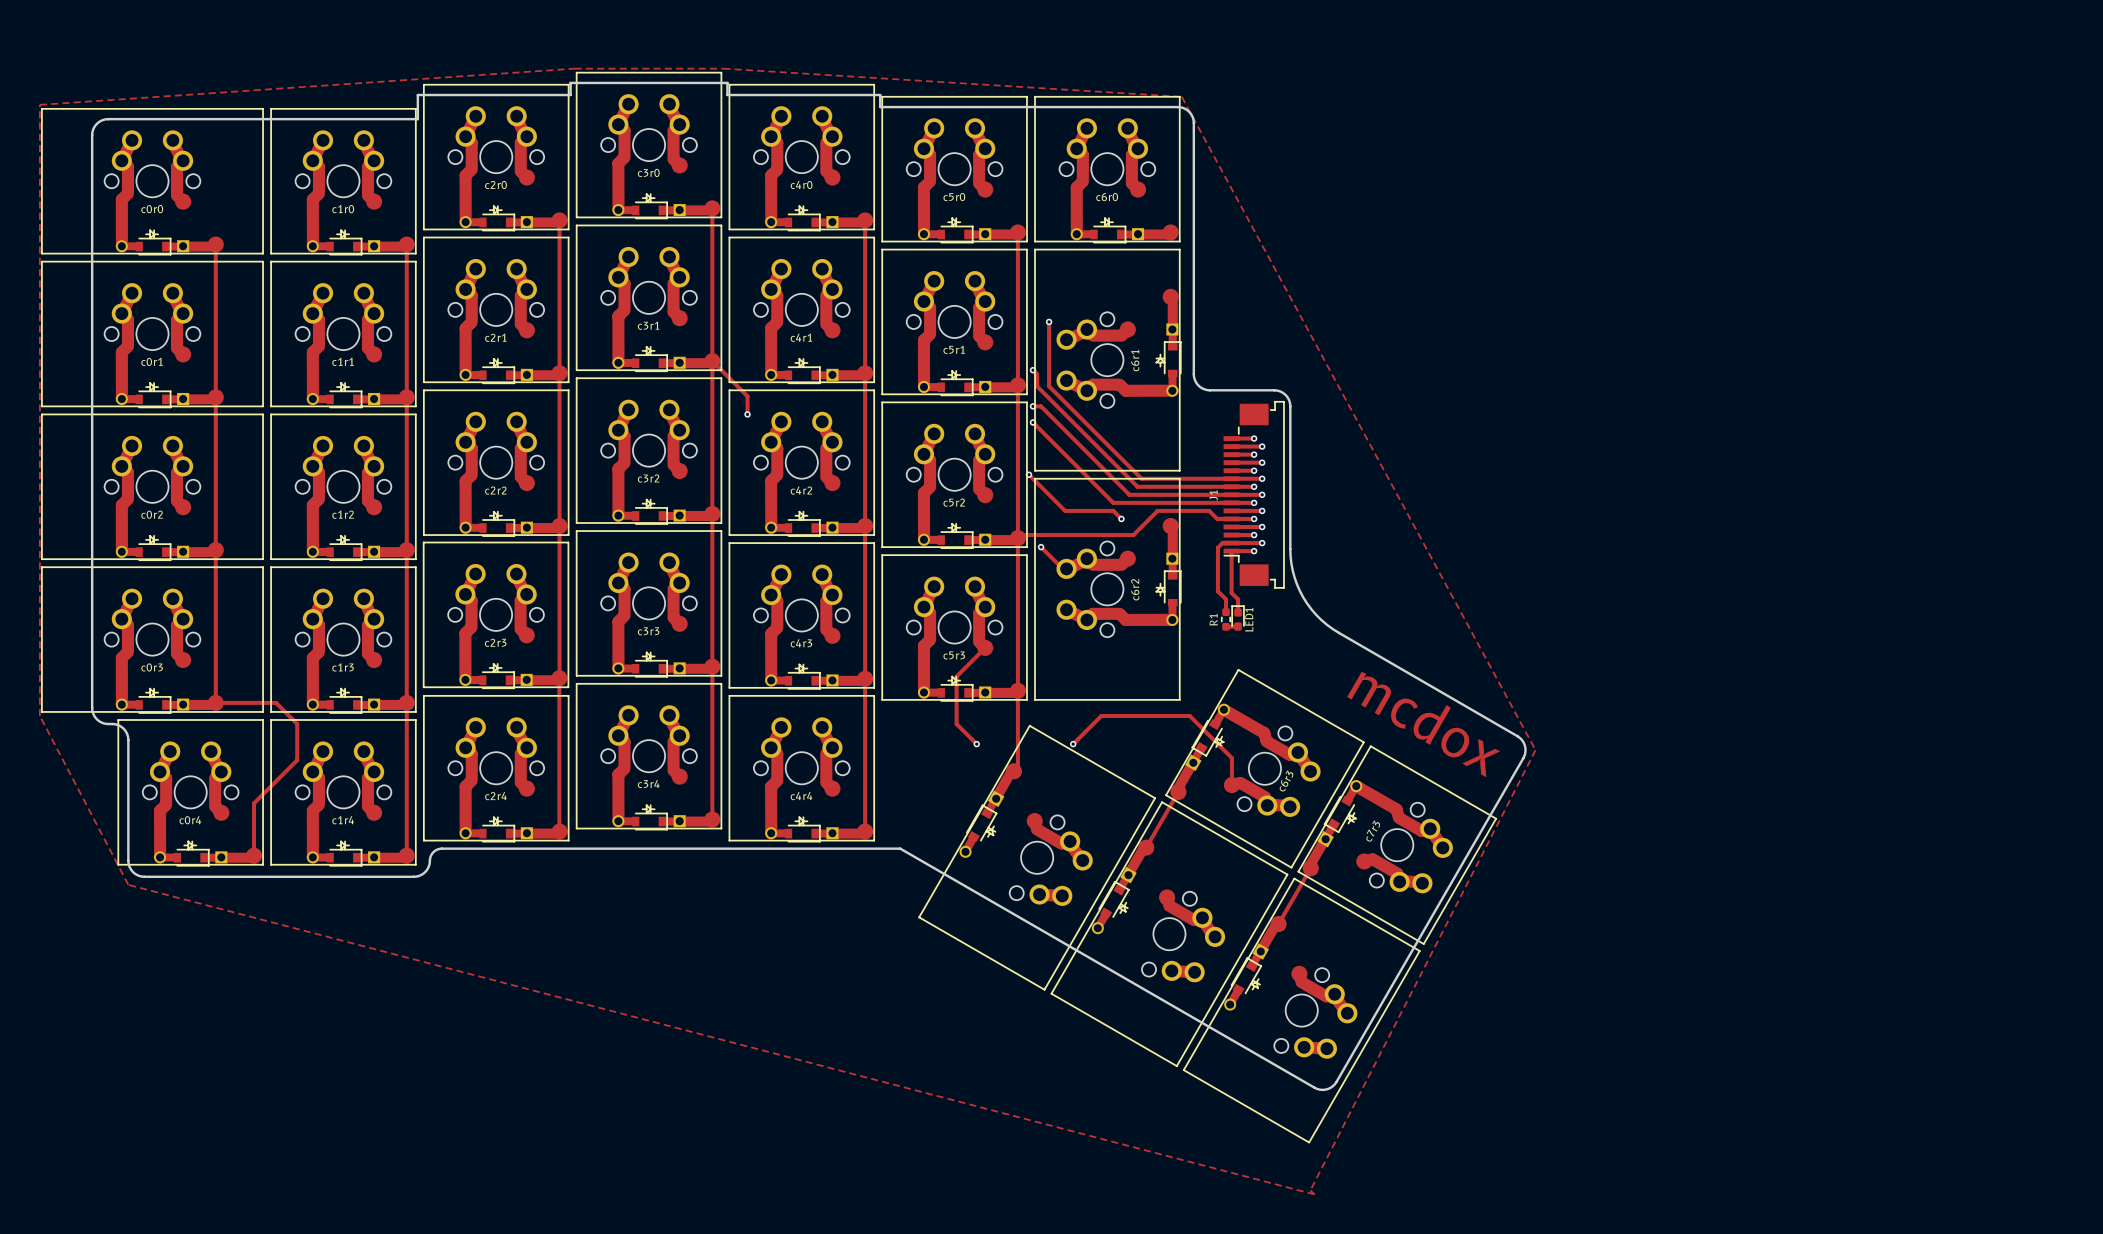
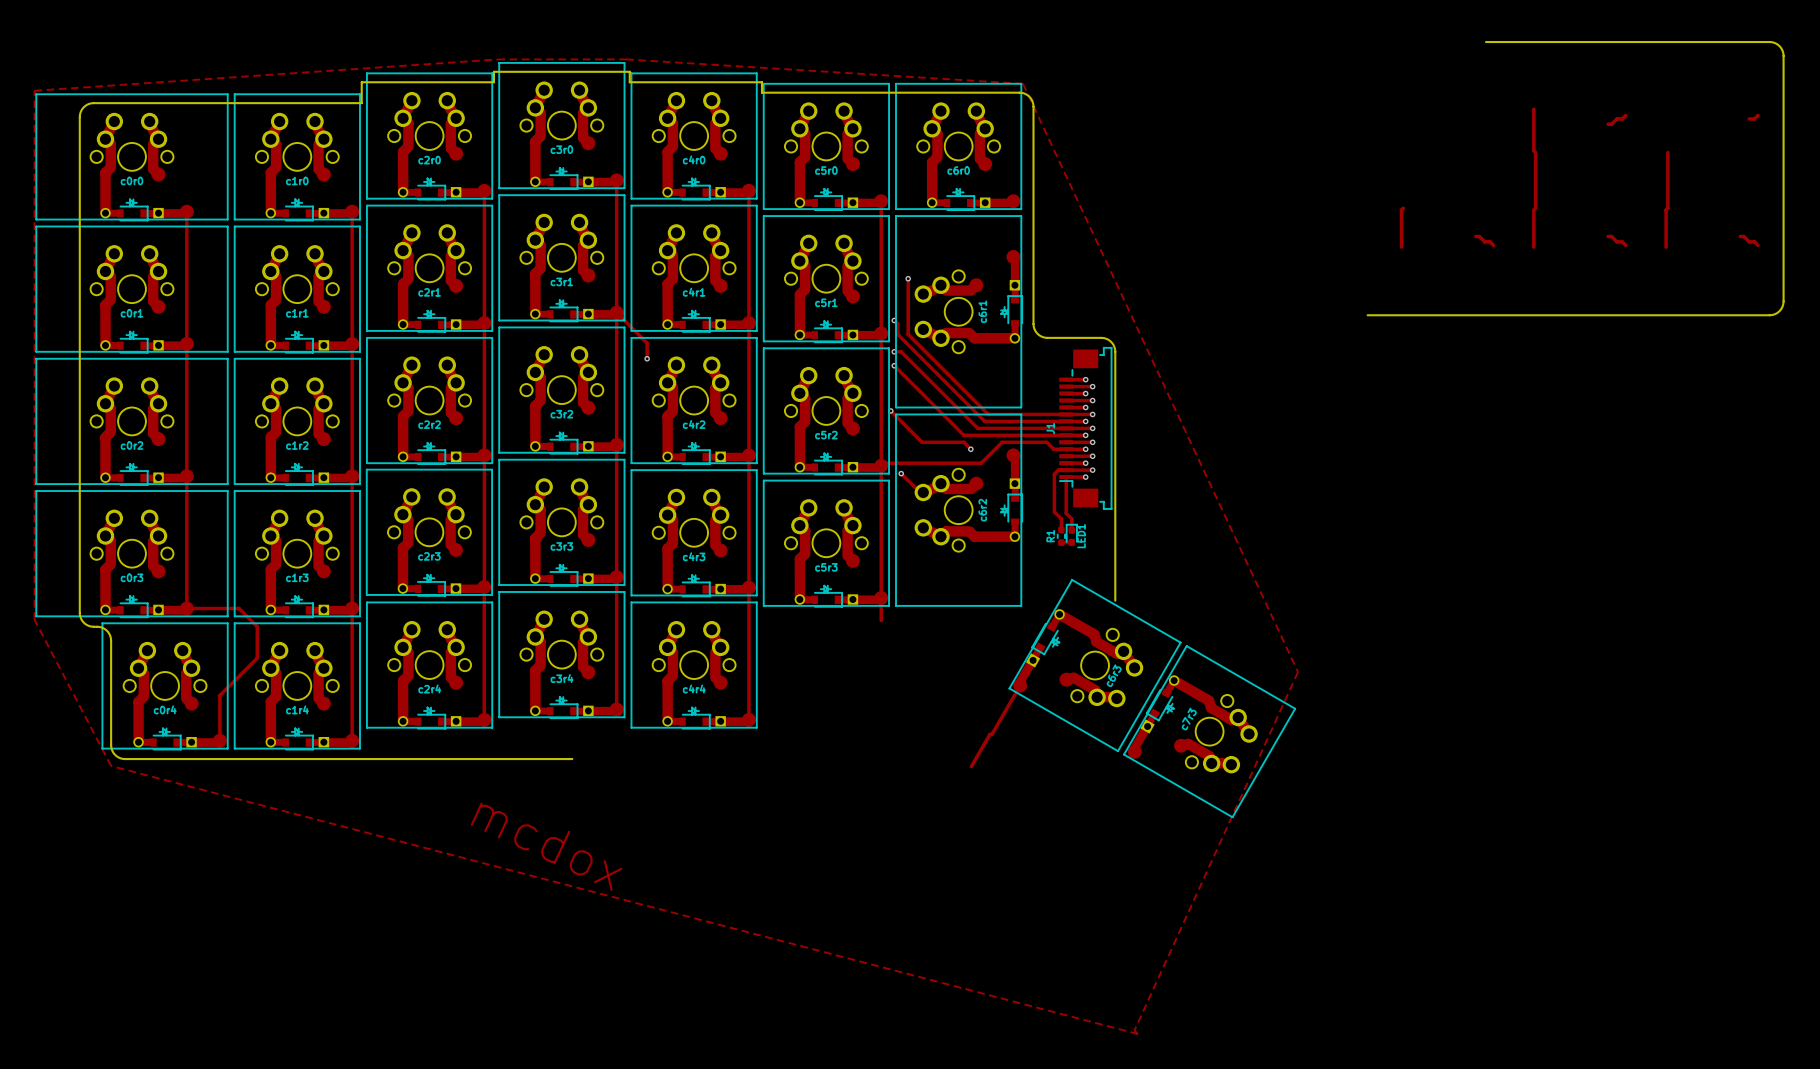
board edge: none -> (1485, 42) (1769, 42) (1779, 46) (1783, 55) (1782, 306) (1776, 313) (1769, 315) (1367, 315)
zone outline: (1181, 96) (1535, 750) (1310, 1190) -> (1023, 83) (1298, 672) (1134, 1030)
track: none -> (1533, 109) (1533, 150) (1535, 152) (1533, 247)
track: none -> (1625, 115) (1622, 118) (1616, 118) (1611, 124) (1608, 124)
track: none -> (1758, 115) (1754, 118) (1749, 118)
track: none -> (1667, 152) (1666, 247)
track: none -> (1403, 208) (1401, 210) (1401, 247)
track: none -> (1475, 236) (1479, 236) (1484, 241) (1489, 241) (1493, 245)
track: none -> (1608, 236) (1611, 236) (1616, 241) (1622, 241) (1625, 245)
track: none -> (1740, 236) (1743, 236) (1749, 241) (1754, 241) (1758, 245)
board edge: (1272, 390) (1284, 393) (1290, 404) (1290, 556) (1297, 584) (1307, 603) (1316, 614) (1332, 629) (1517, 736) (1523, 742) (1525, 748) (1523, 758) (1336, 1081) (1330, 1087) (1322, 1089) (1314, 1087) (900, 848) (441, 848) (432, 853) (425, 872) (413, 876) -> (572, 759) (358, 759)
board edge: none -> (1101, 337) (1111, 341) (1115, 351) (1115, 600)
track: (985, 647) (956, 676) (956, 724) (976, 744) -> none
track: (1017, 716) (1017, 767) (1011, 772) (989, 809) -> none
text: mcdox (1423, 724) -> none
via: (976, 744) -> none
track: (1073, 744) (1101, 715) (1189, 715) (1231, 758) (1231, 785) -> none
via: (1073, 744) -> none
part: (1037, 857) -> none
track: (1310, 868) (1254, 961) -> none
part: (1169, 934) -> none
text: none -> mcdox (546, 846)
part: (1301, 1010) -> none

